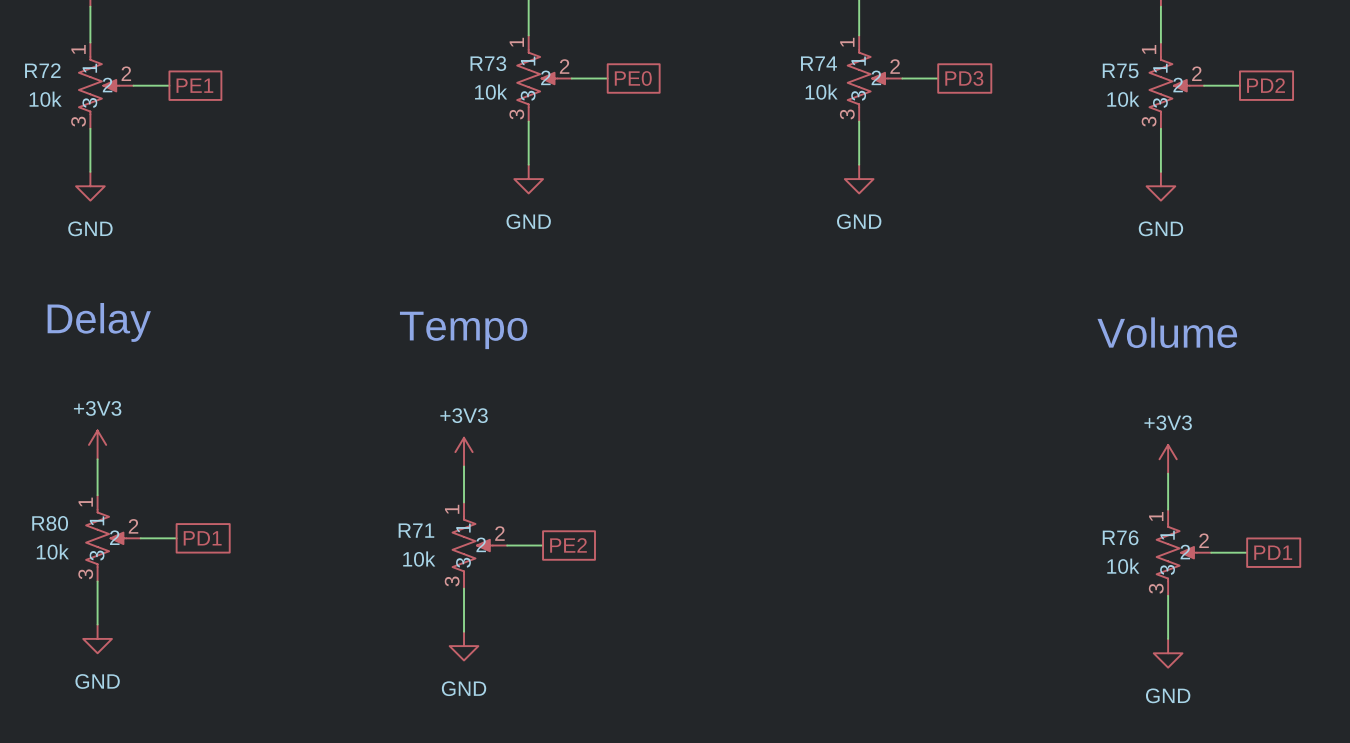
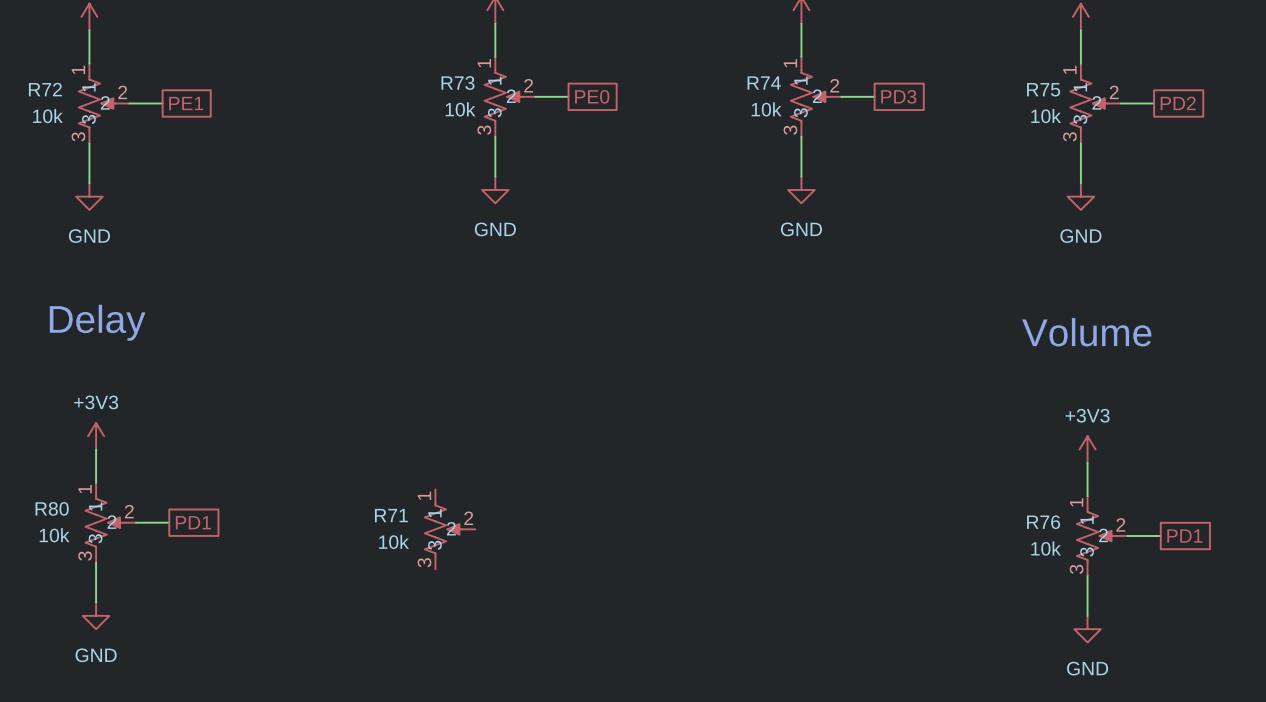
text: Tempo (463, 330) -> none
power symbol: +3V3 (464, 452) -> none
wire: (464, 466) (464, 502) -> none
wire: (507, 545) (543, 545) -> none
global label: PE2 (568, 545) -> none
wire: (464, 588) (464, 631) -> none
power symbol: GND (464, 646) -> none

